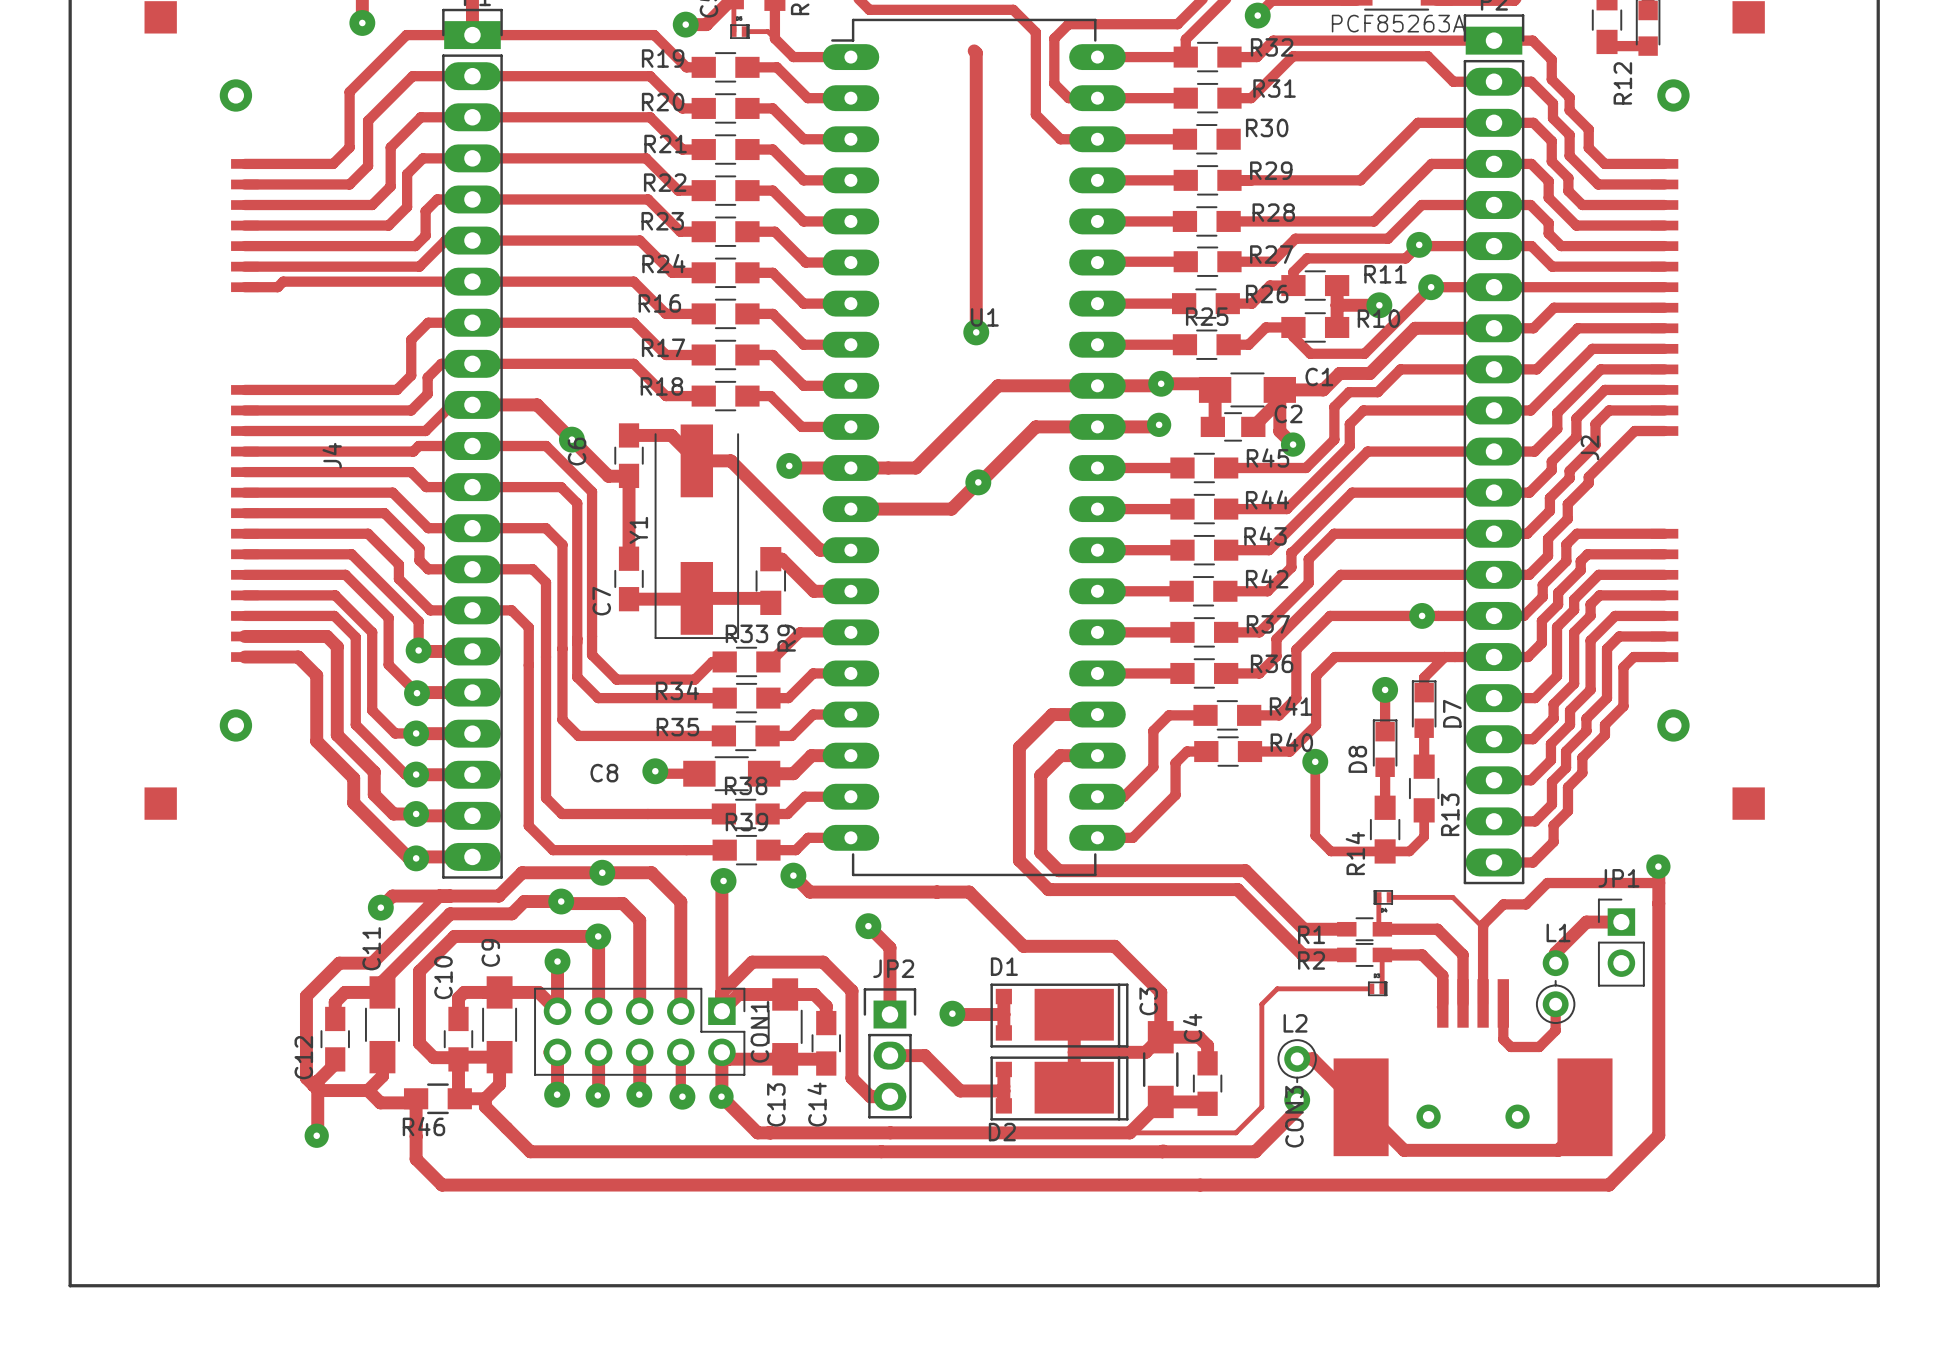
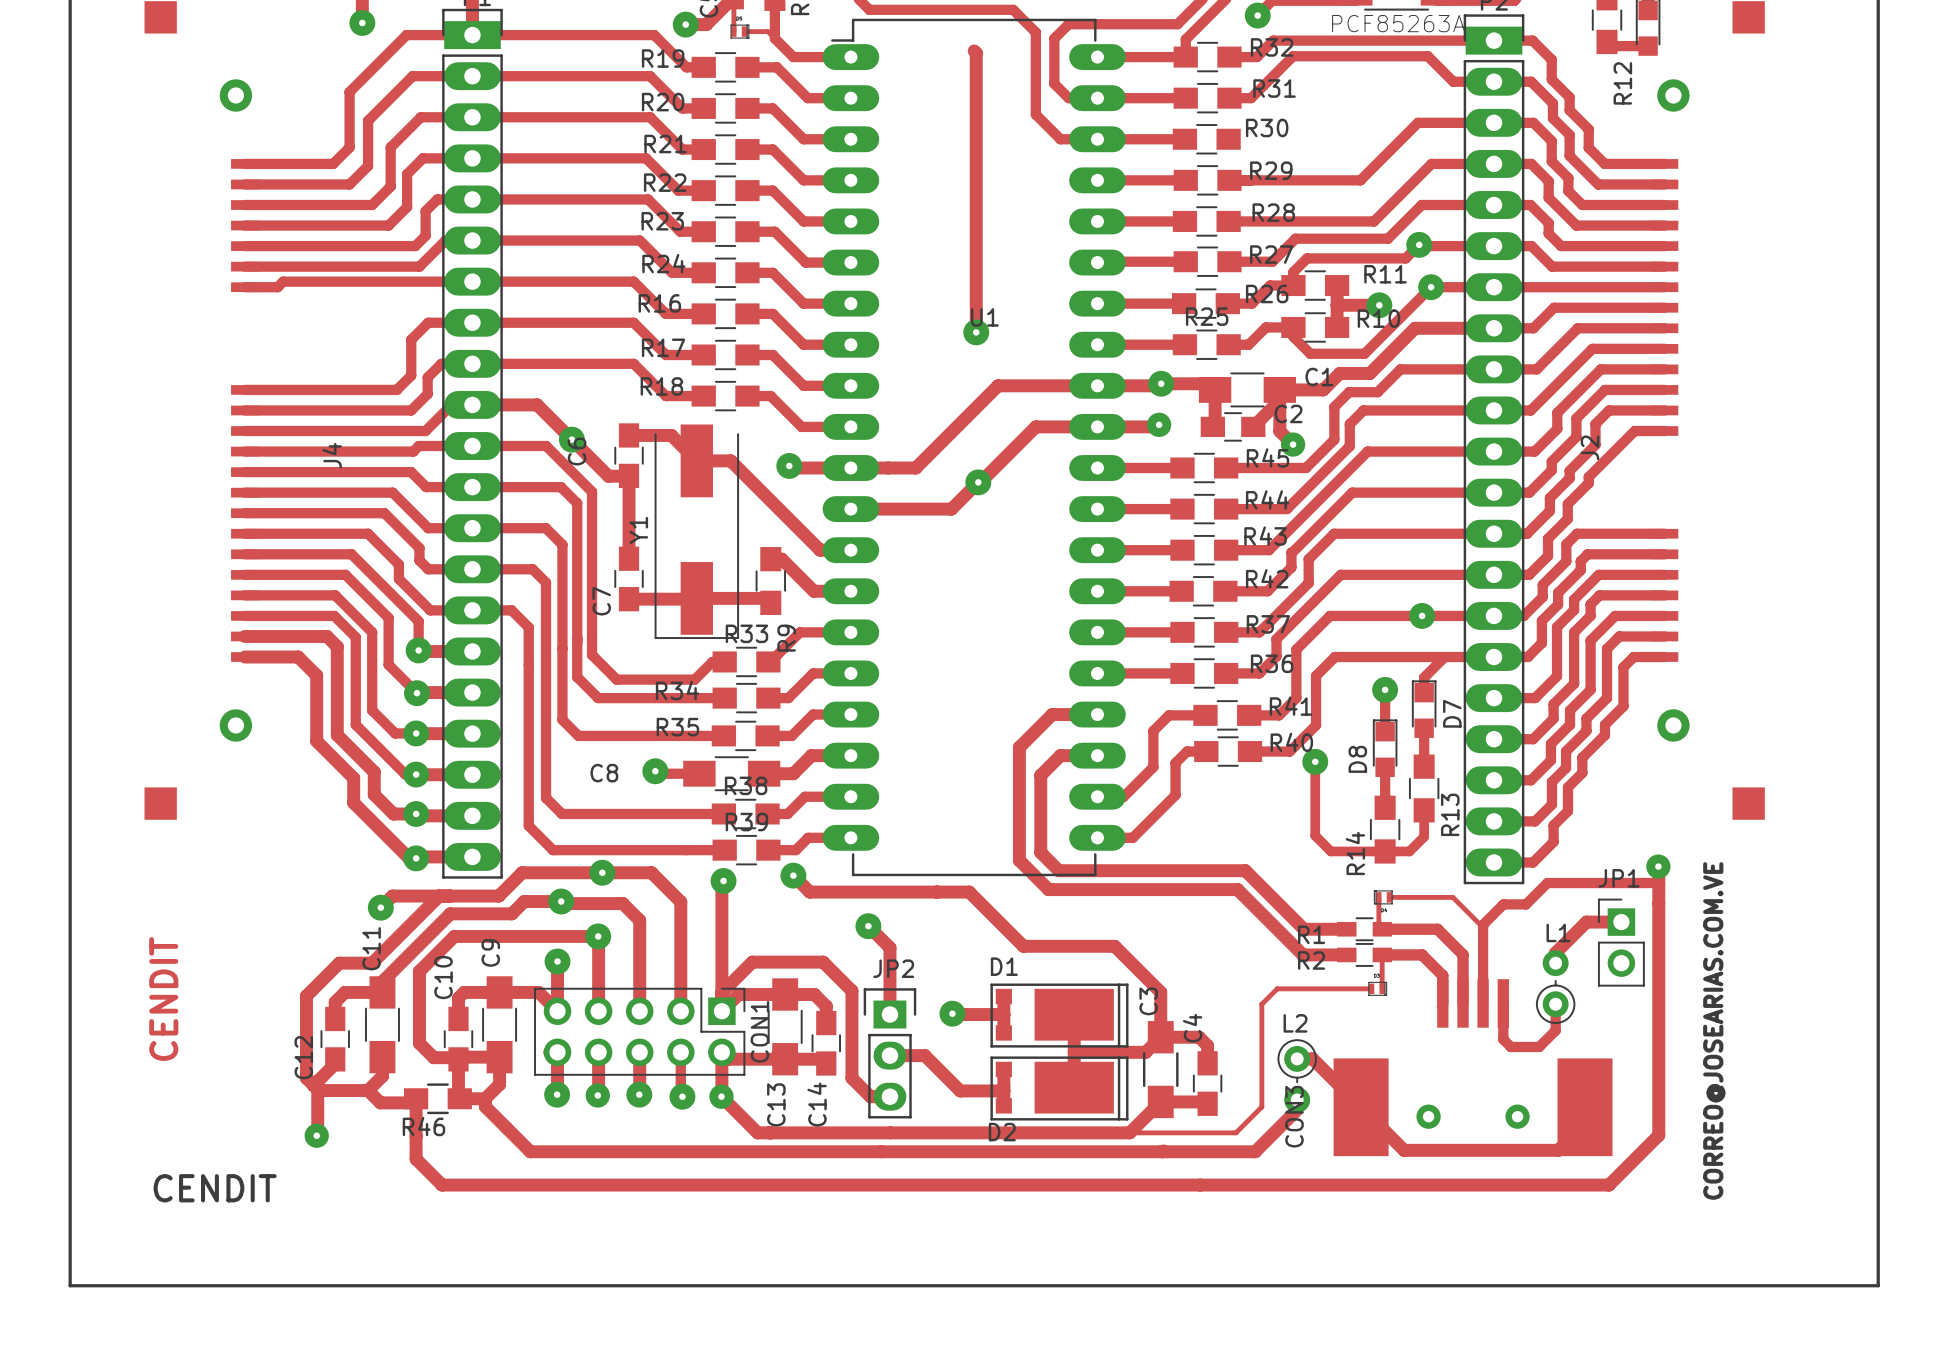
text: none -> CENDIT (163, 998)
text: none -> CORREO@JOSEARIAS.COM.VE (1714, 1030)
text: none -> CENDIT (215, 1188)

